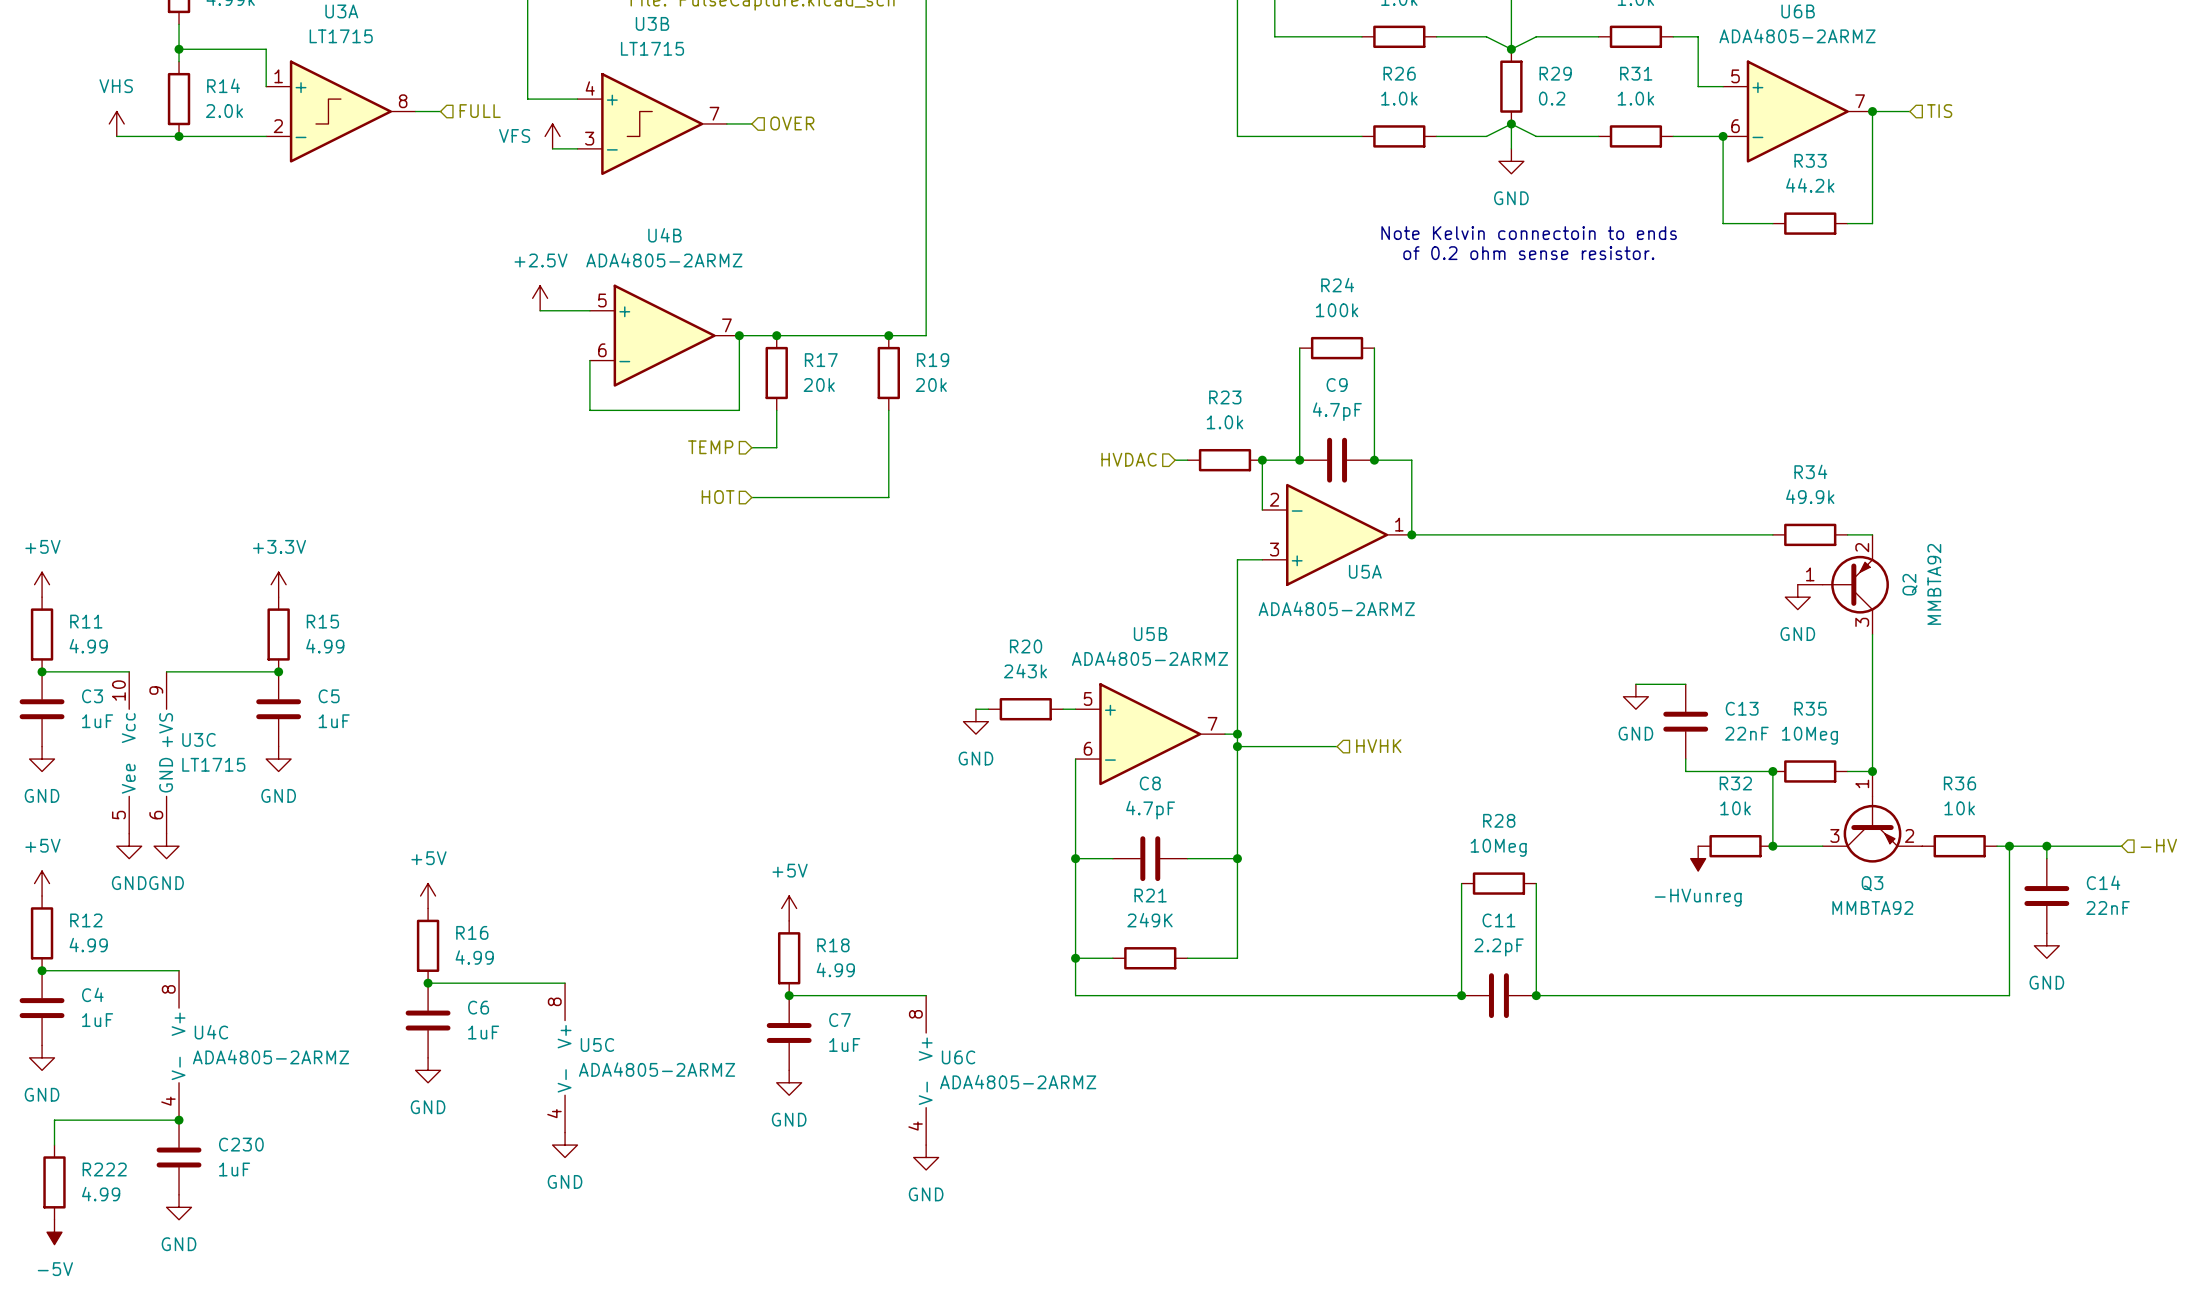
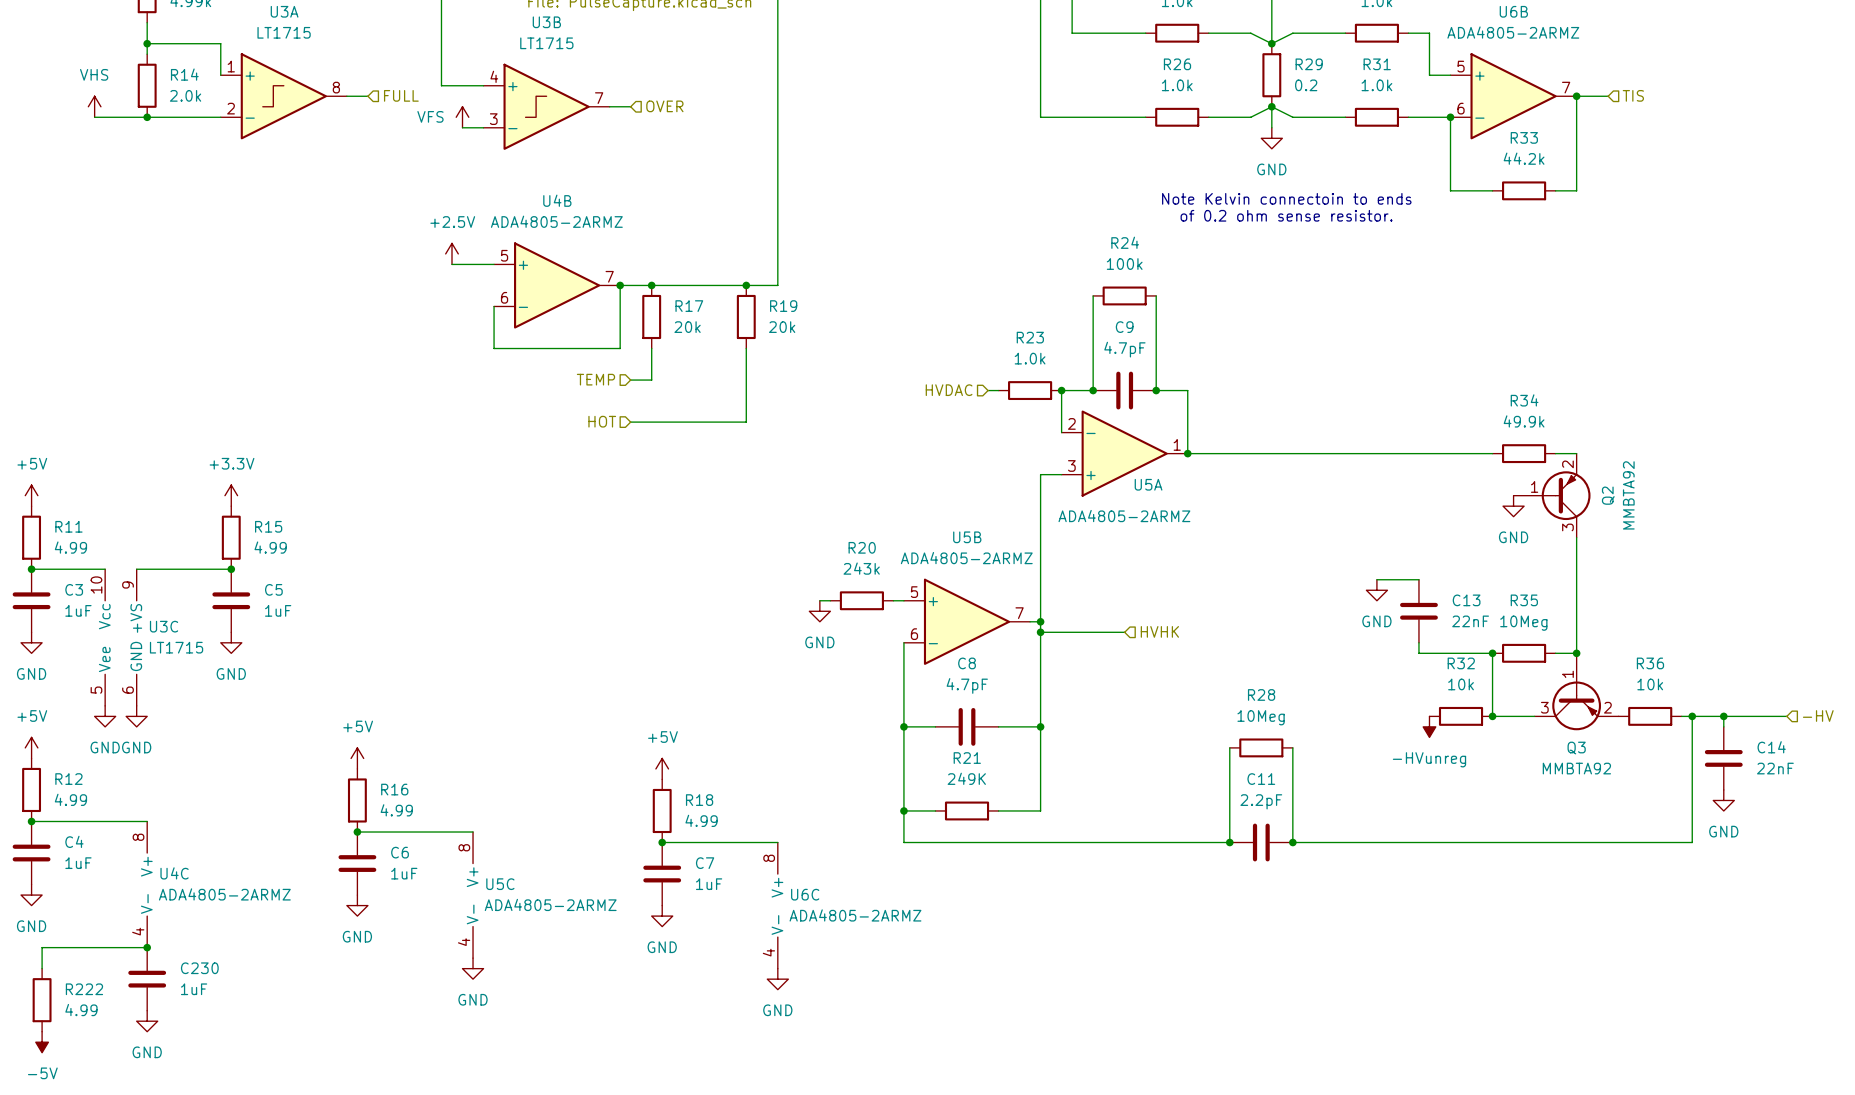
Q2 symbol: [1797, 534, 1889, 635] -> [1513, 453, 1591, 538]
Q3 symbol: [1822, 771, 1923, 863] -> [1534, 653, 1619, 731]

